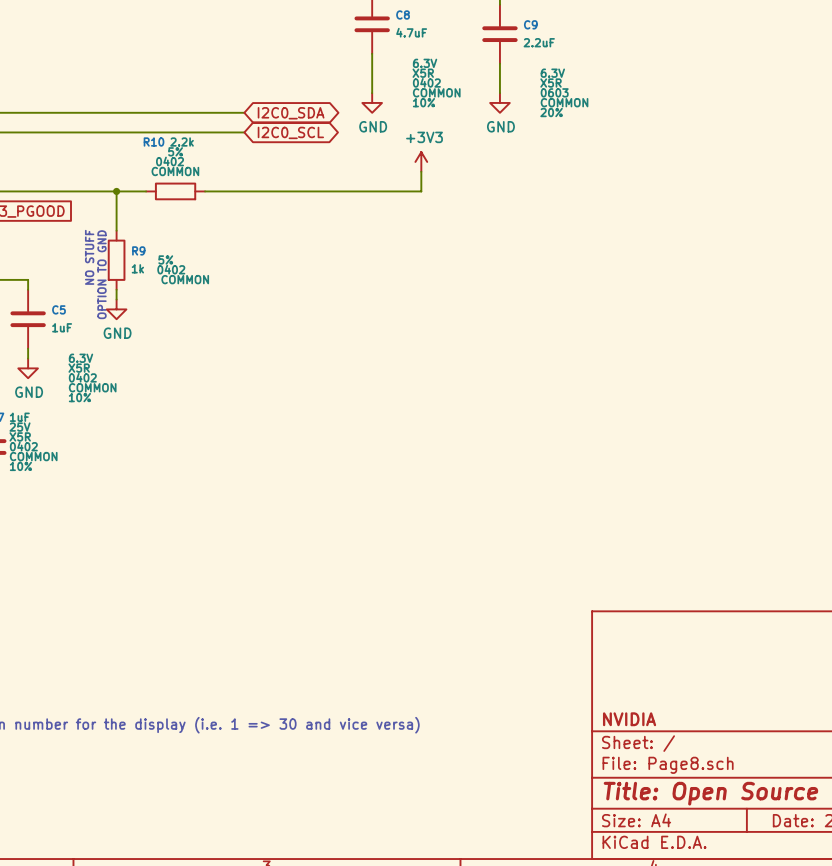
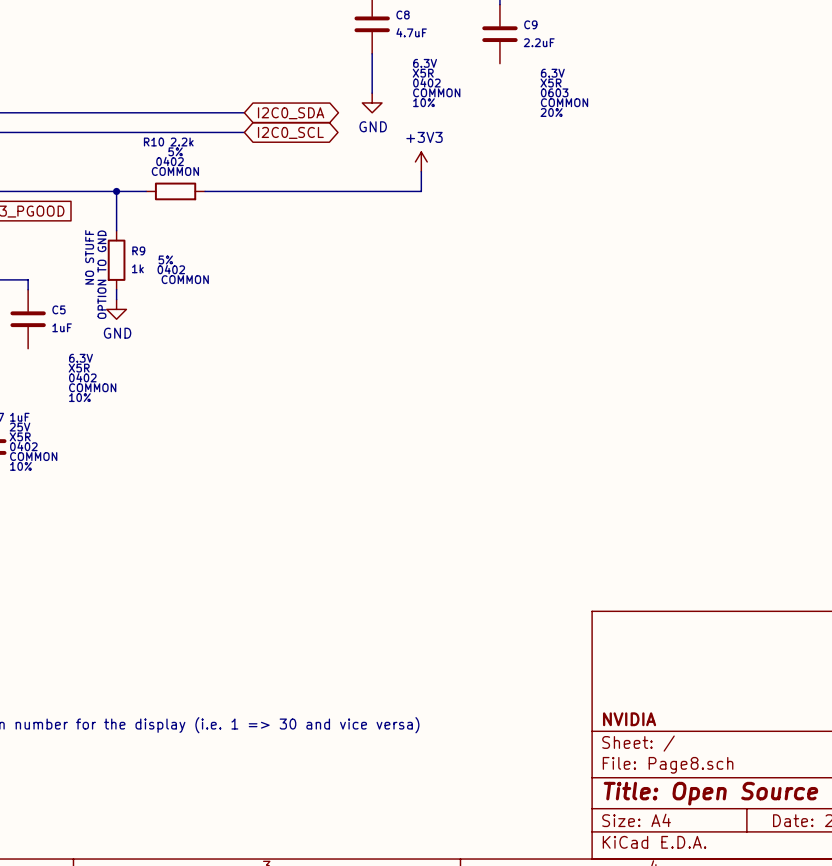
wire: (499, 63) (499, 93) -> none
power symbol: GND (499, 102) -> none
wire: (28, 348) (28, 358) -> none
power symbol: GND (28, 368) -> none

